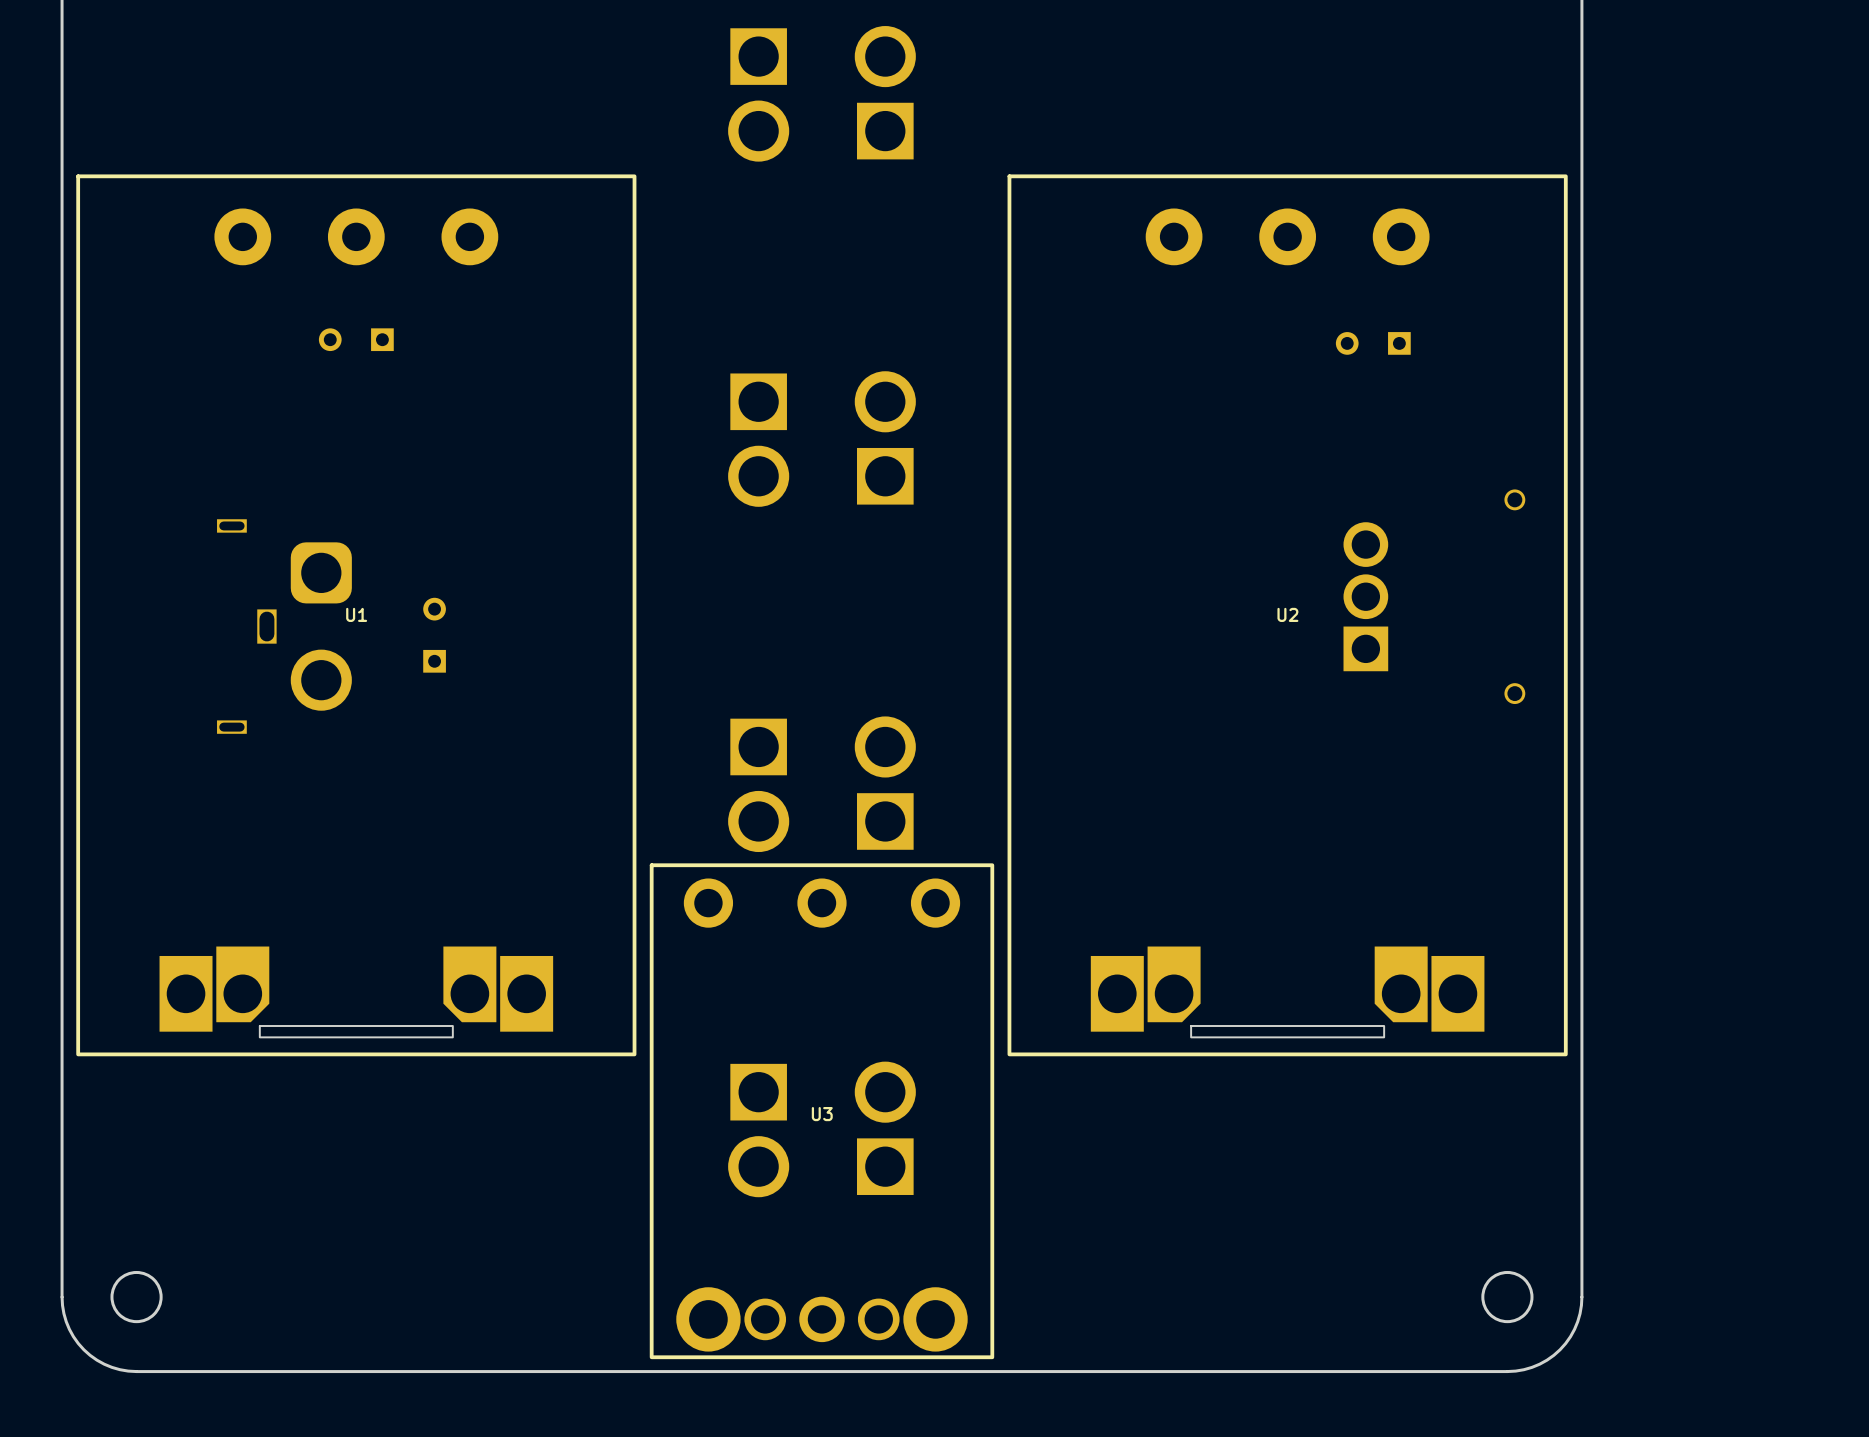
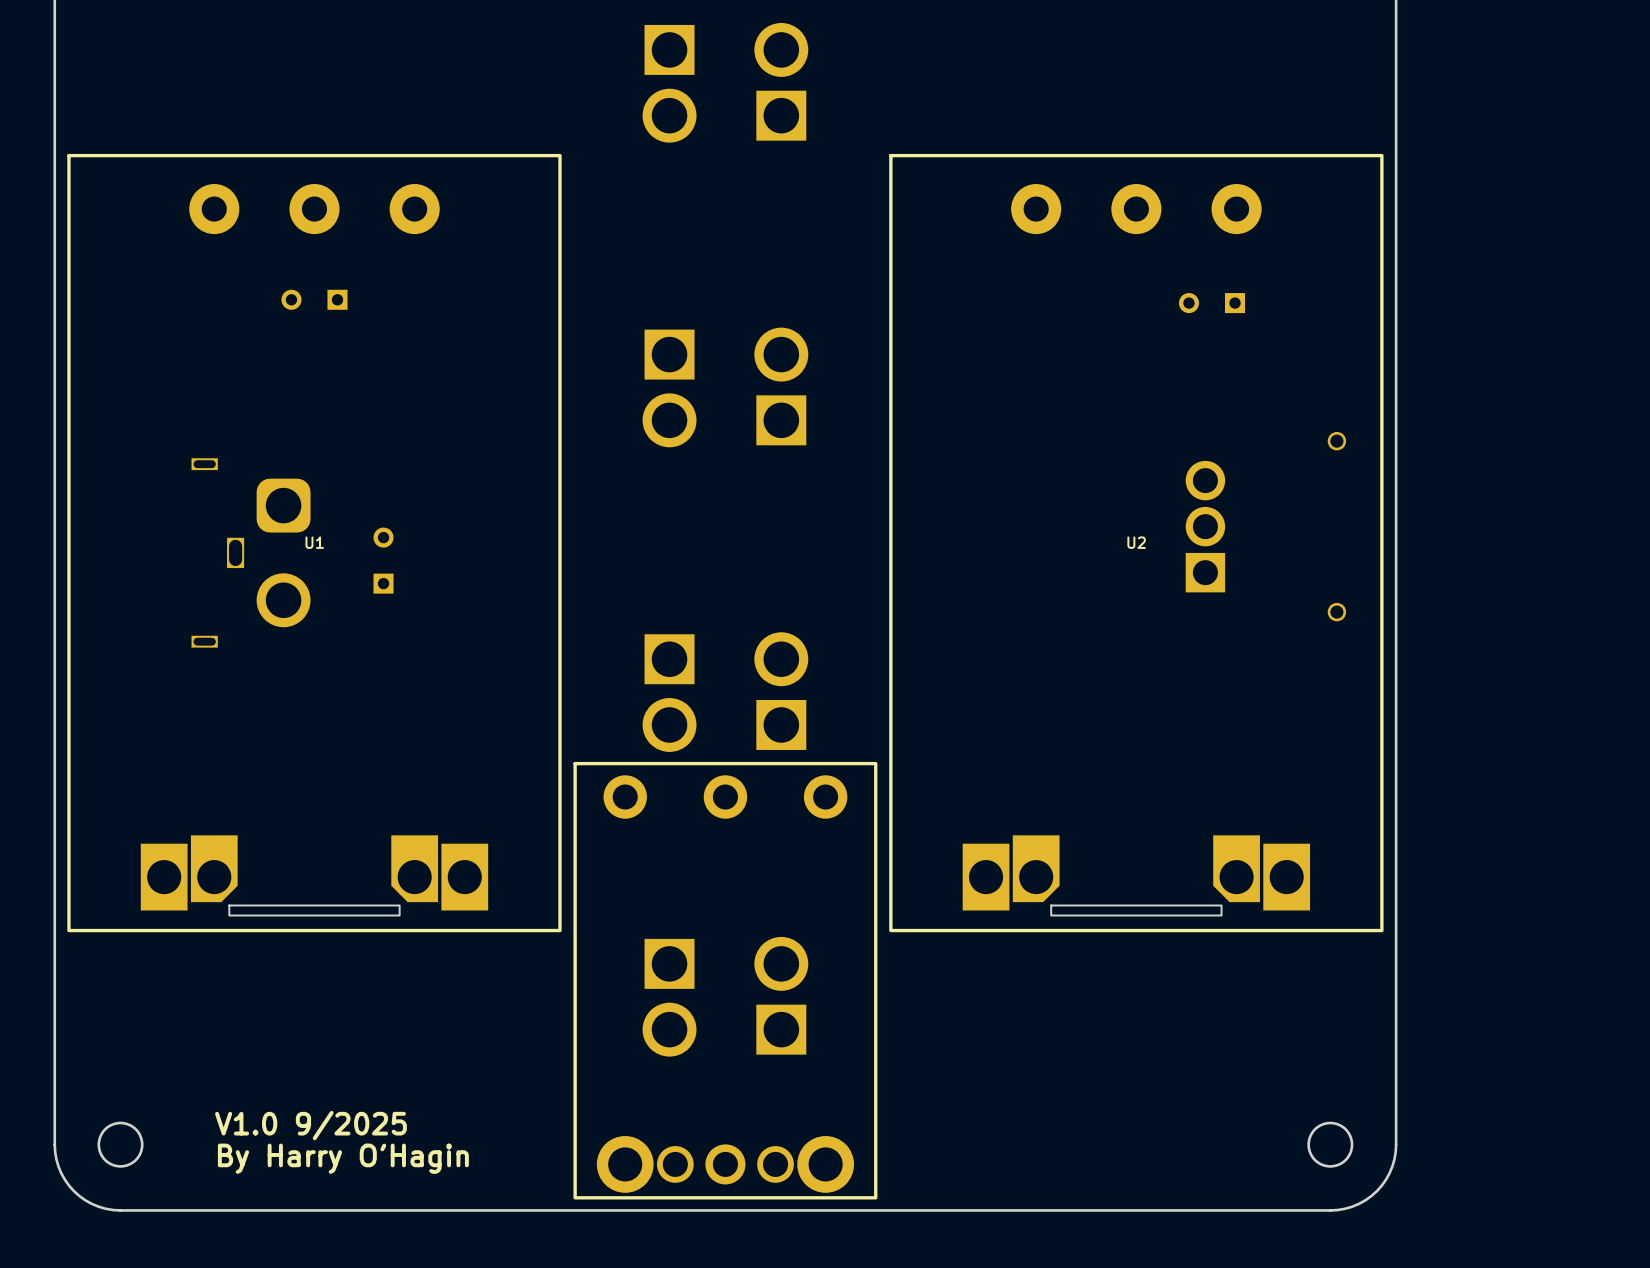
U3 name: U3 (822, 1114) -> none
text: none -> V1.0 9/2025 (310, 1125)
text: none -> By Harry O'Hagin (343, 1158)

